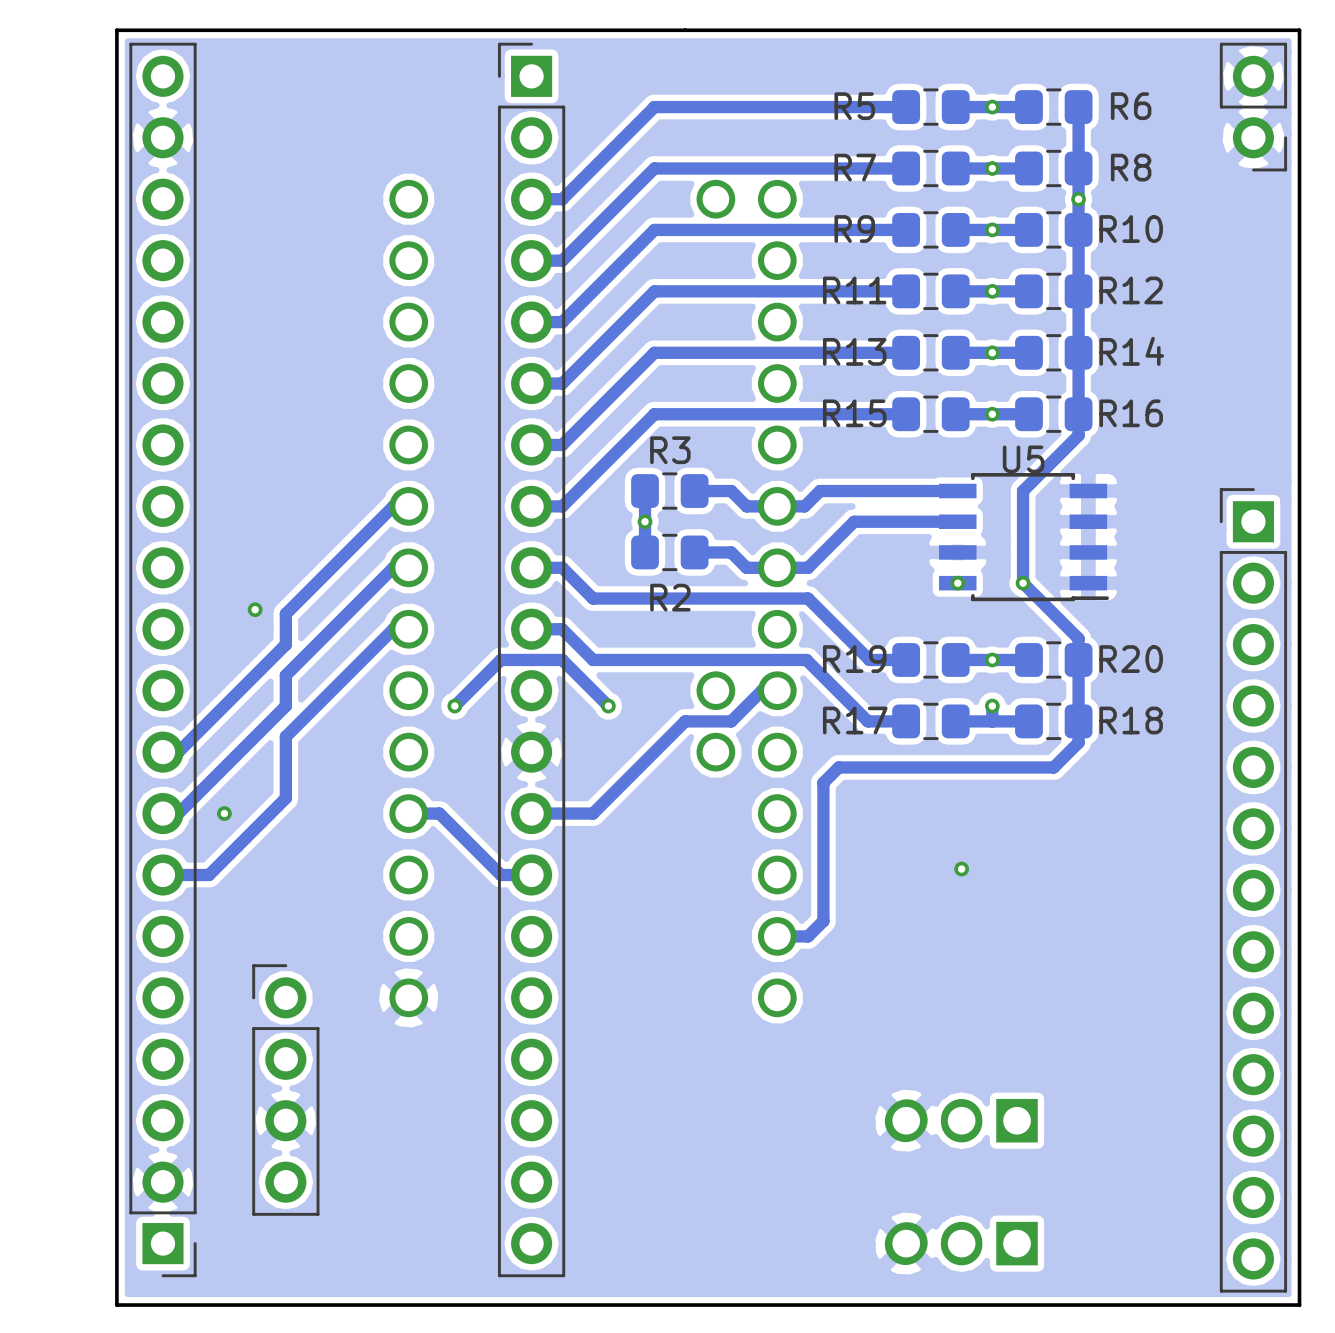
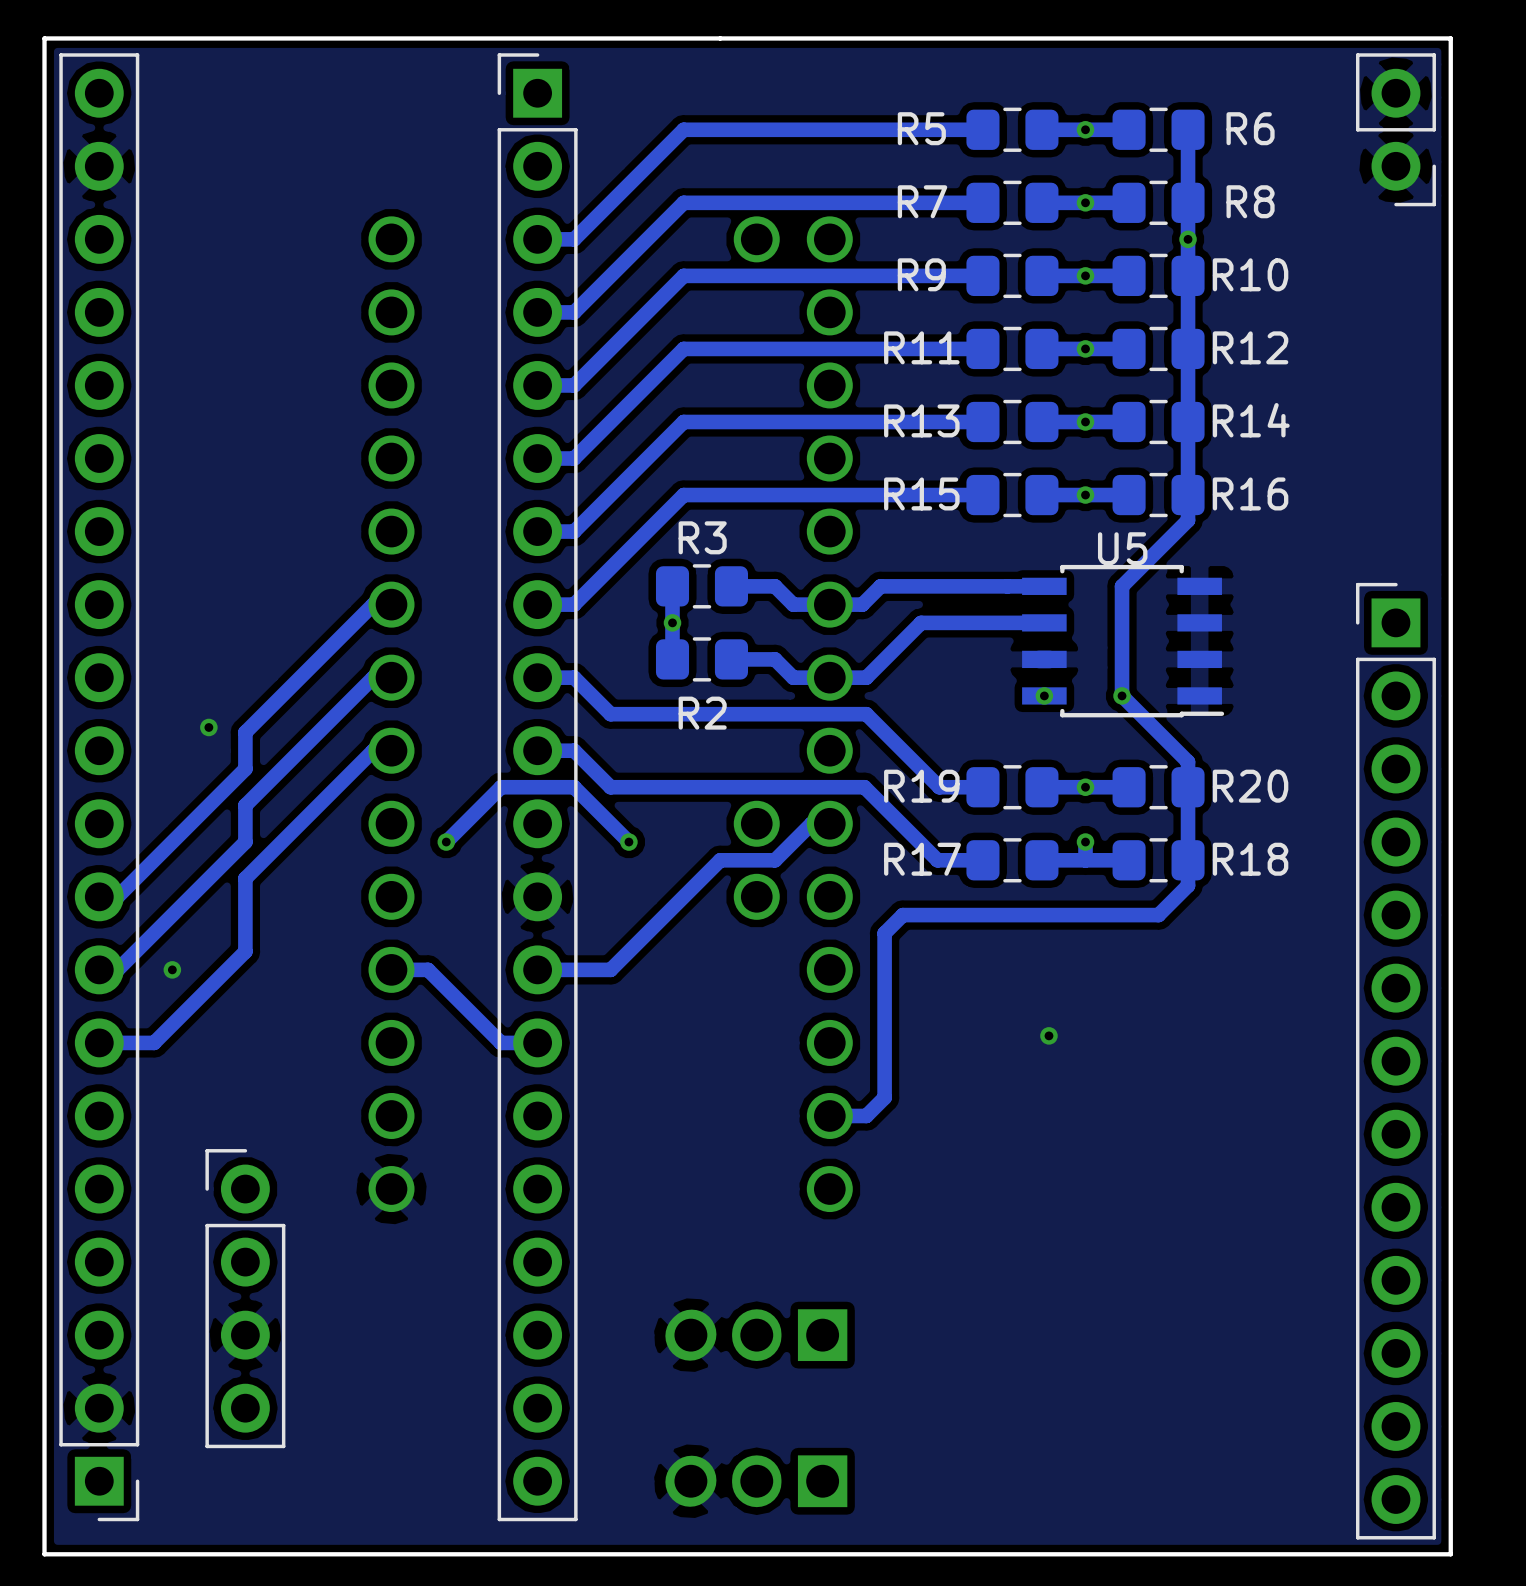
part: none -> (756, 1335)
part: (961, 1120) -> none
part: none -> (756, 1481)
part: (961, 1243) -> none

